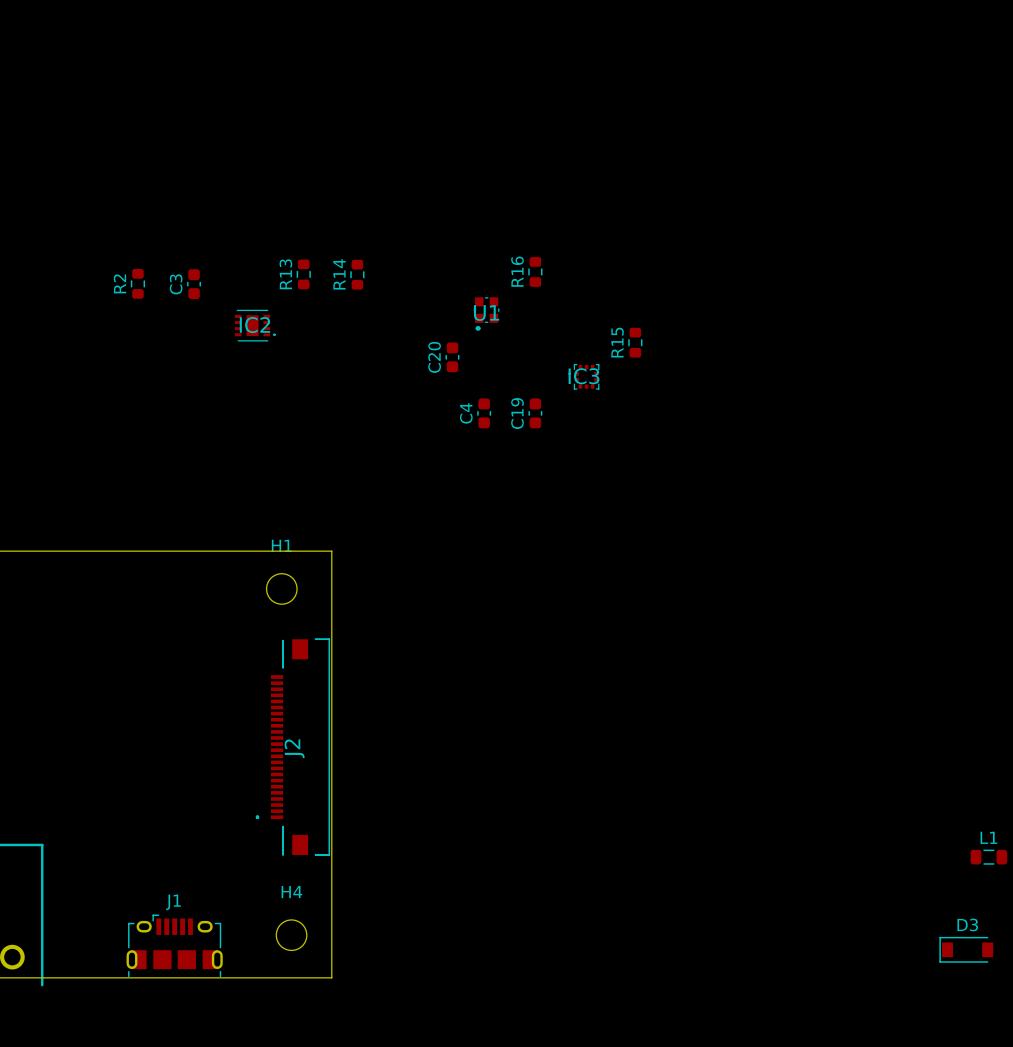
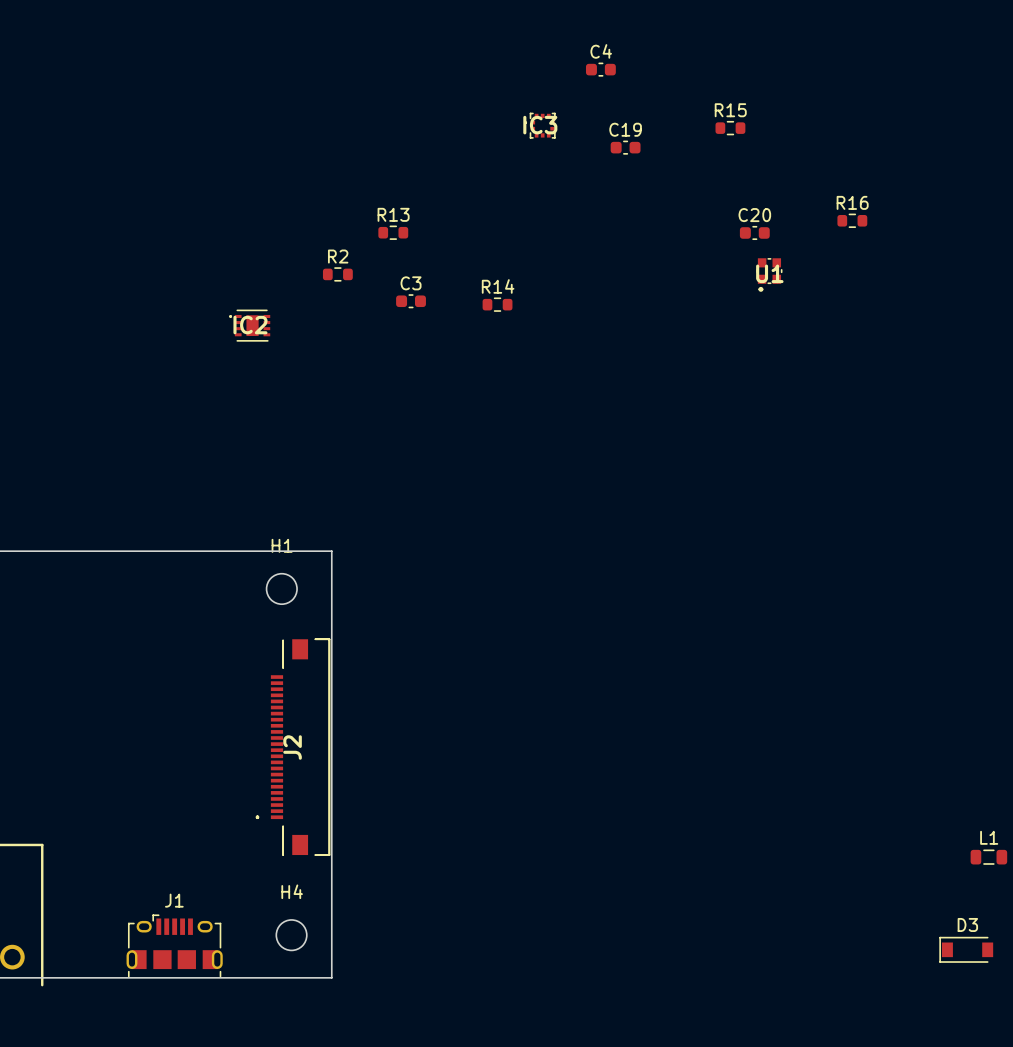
R16 rotation: 0° (535, 271) -> 90° clockwise (852, 220)
R16 position: (535, 271) -> (852, 220)
R13 rotation: 0° (303, 274) -> 90° clockwise (393, 232)
R13 position: (303, 274) -> (393, 232)
R14 rotation: 0° (357, 274) -> 90° clockwise (497, 304)
R14 position: (357, 274) -> (497, 304)
R2 rotation: 0° (137, 283) -> 90° clockwise (337, 274)
R2 position: (137, 283) -> (337, 274)
C3 rotation: 0° (194, 284) -> 90° clockwise (411, 301)
C3 position: (194, 284) -> (411, 301)
U1 position: (486, 314) -> (769, 275)
IC2 rotation: 0° (255, 325) -> 180° (249, 325)
R15 rotation: 0° (635, 342) -> 90° clockwise (730, 128)
R15 position: (635, 342) -> (730, 128)
C20 rotation: 0° (452, 357) -> 90° clockwise (754, 232)
C20 position: (452, 357) -> (754, 232)
IC3 position: (583, 376) -> (539, 125)
C4 rotation: 0° (484, 413) -> 90° clockwise (600, 69)
C4 position: (484, 413) -> (600, 69)
C19 rotation: 0° (535, 413) -> 90° clockwise (625, 147)
C19 position: (535, 413) -> (625, 147)

